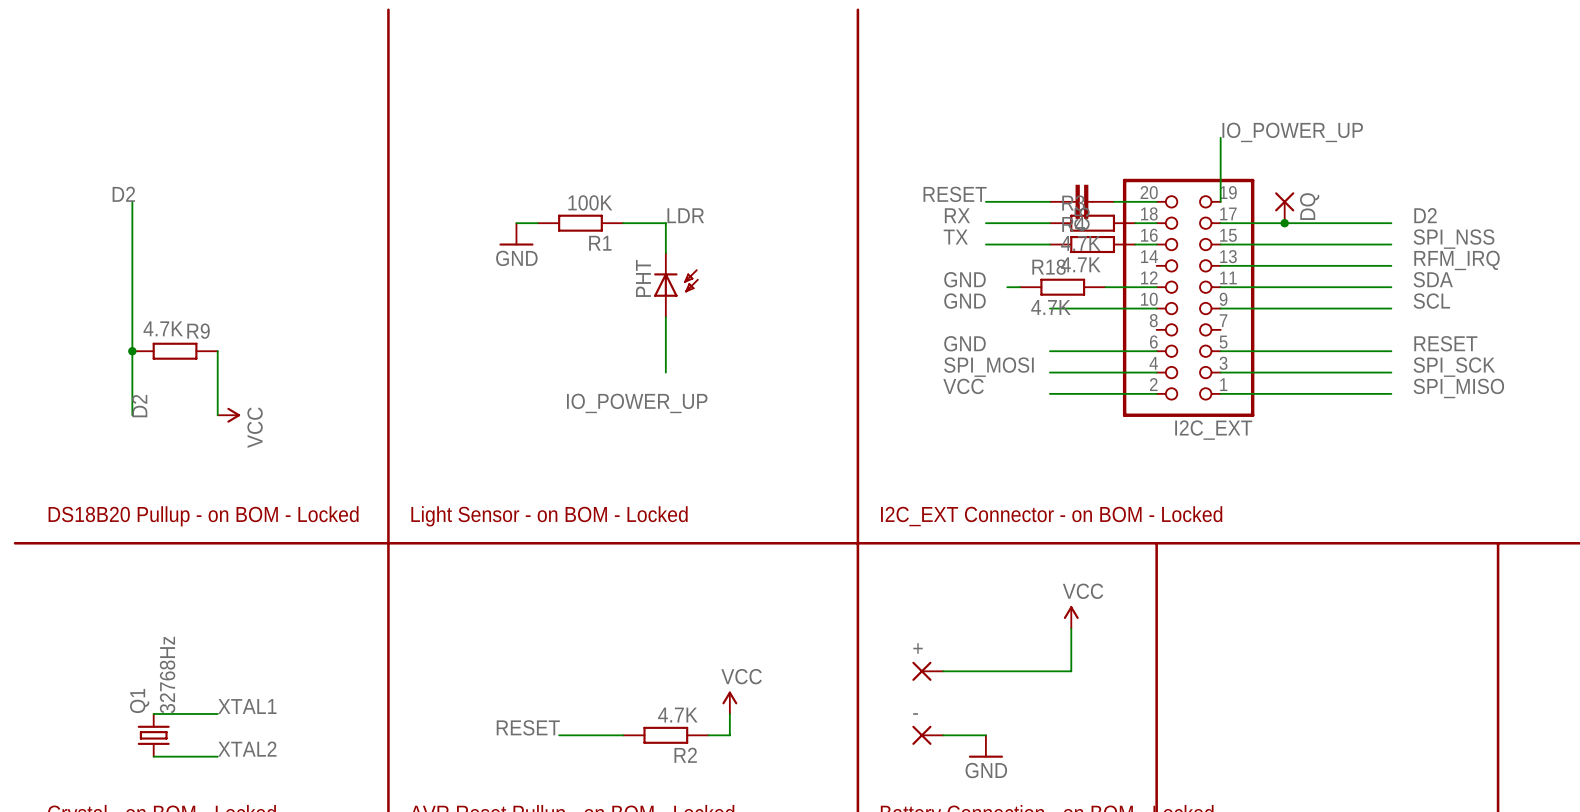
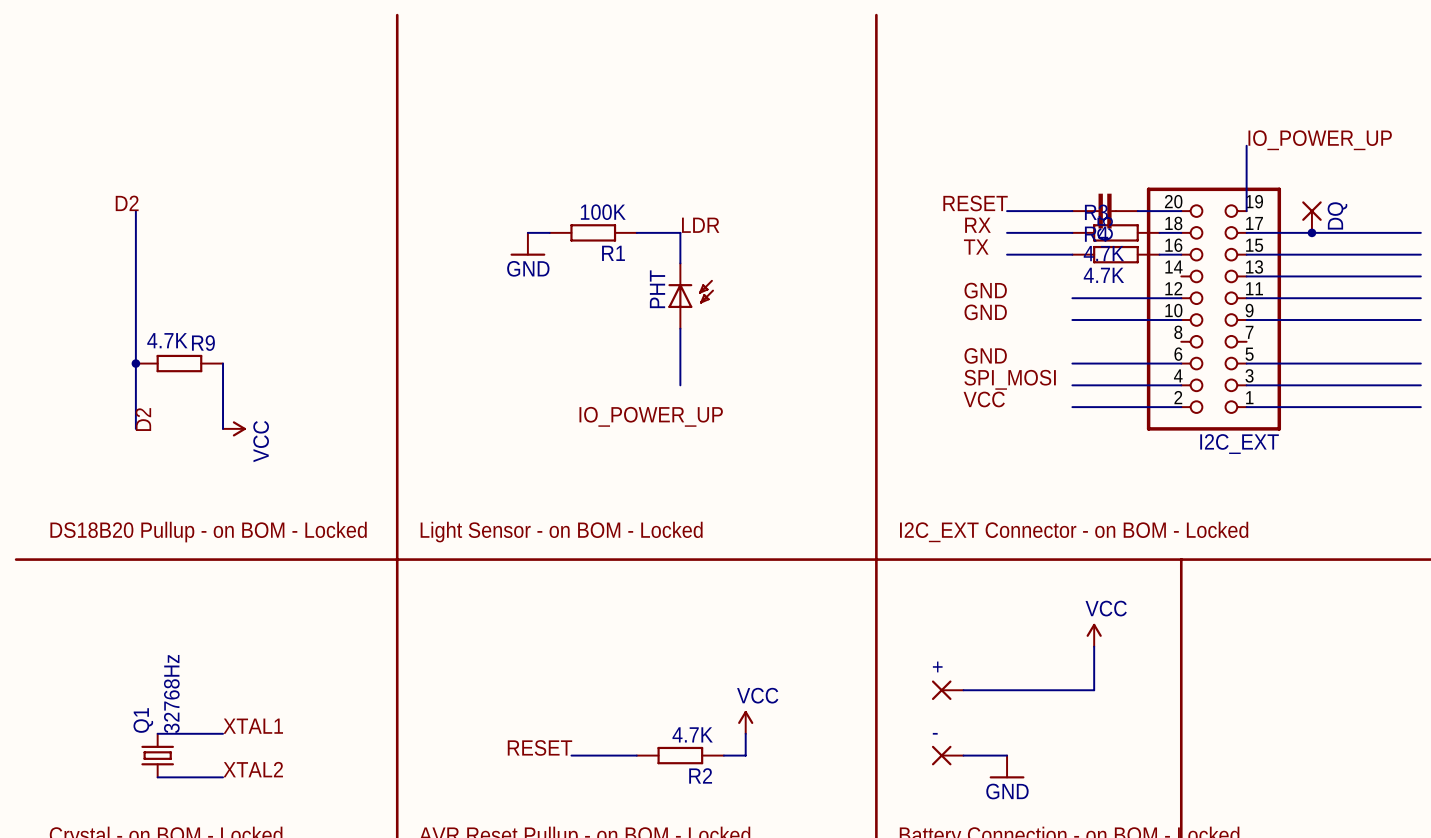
wire: (1007, 287) (1020, 287) -> none
wire: none -> (1072, 298) (1129, 298)
R18: 4.7K (1062, 287) -> none

